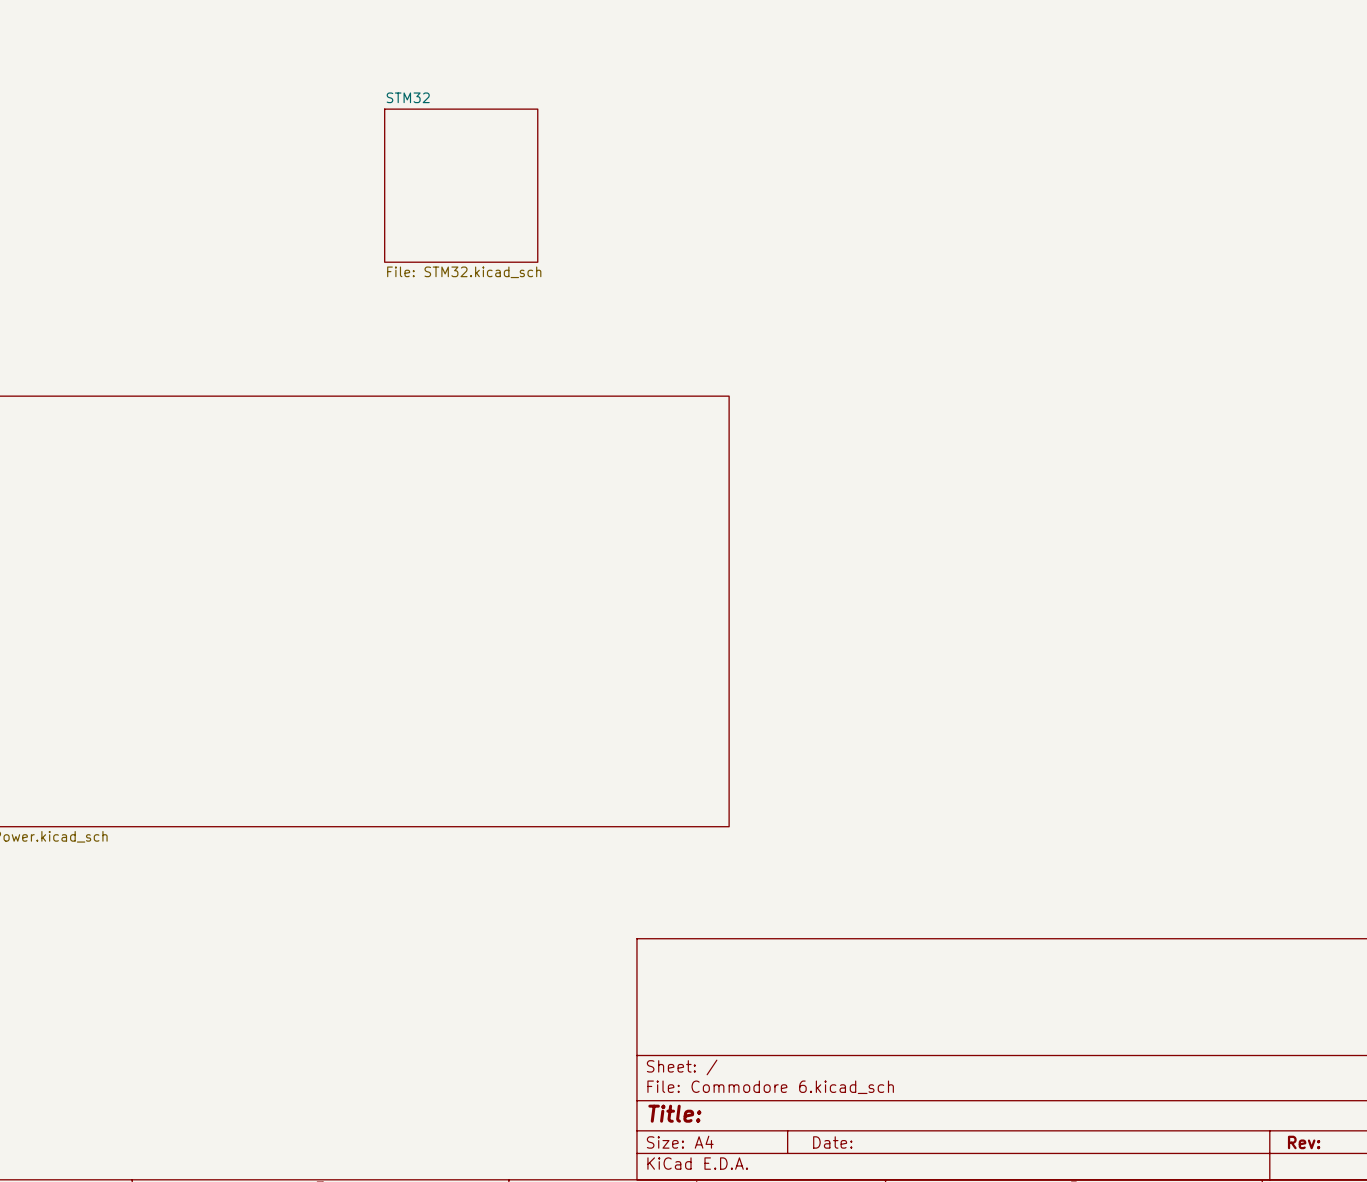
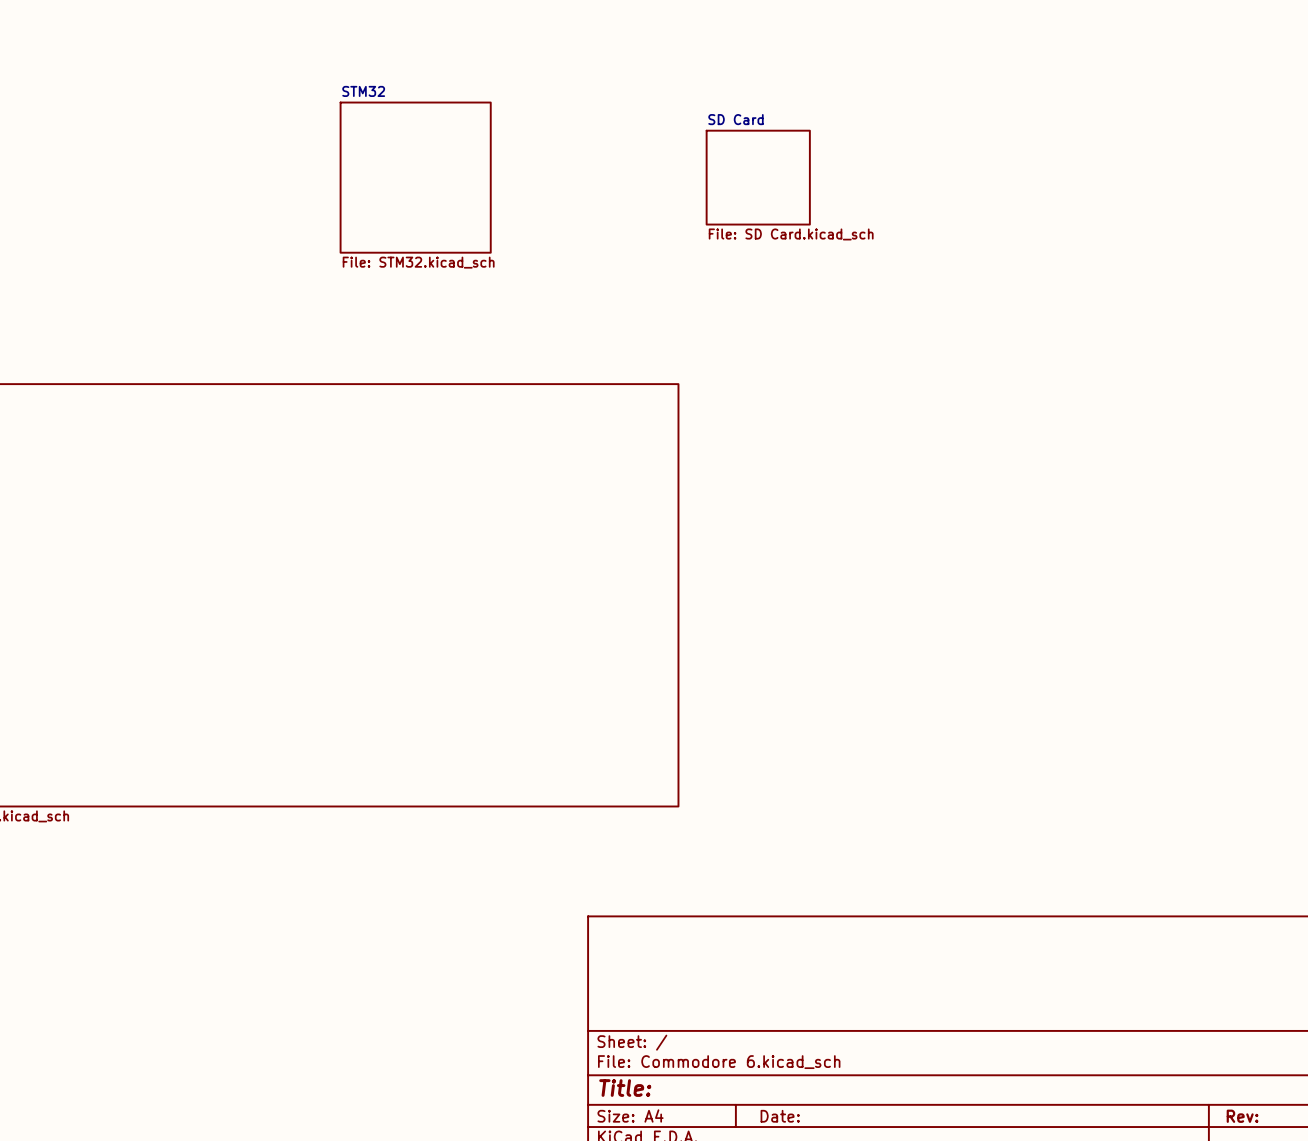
sheet SD Card: none -> File: SD Card.kicad_sch (758, 177)

